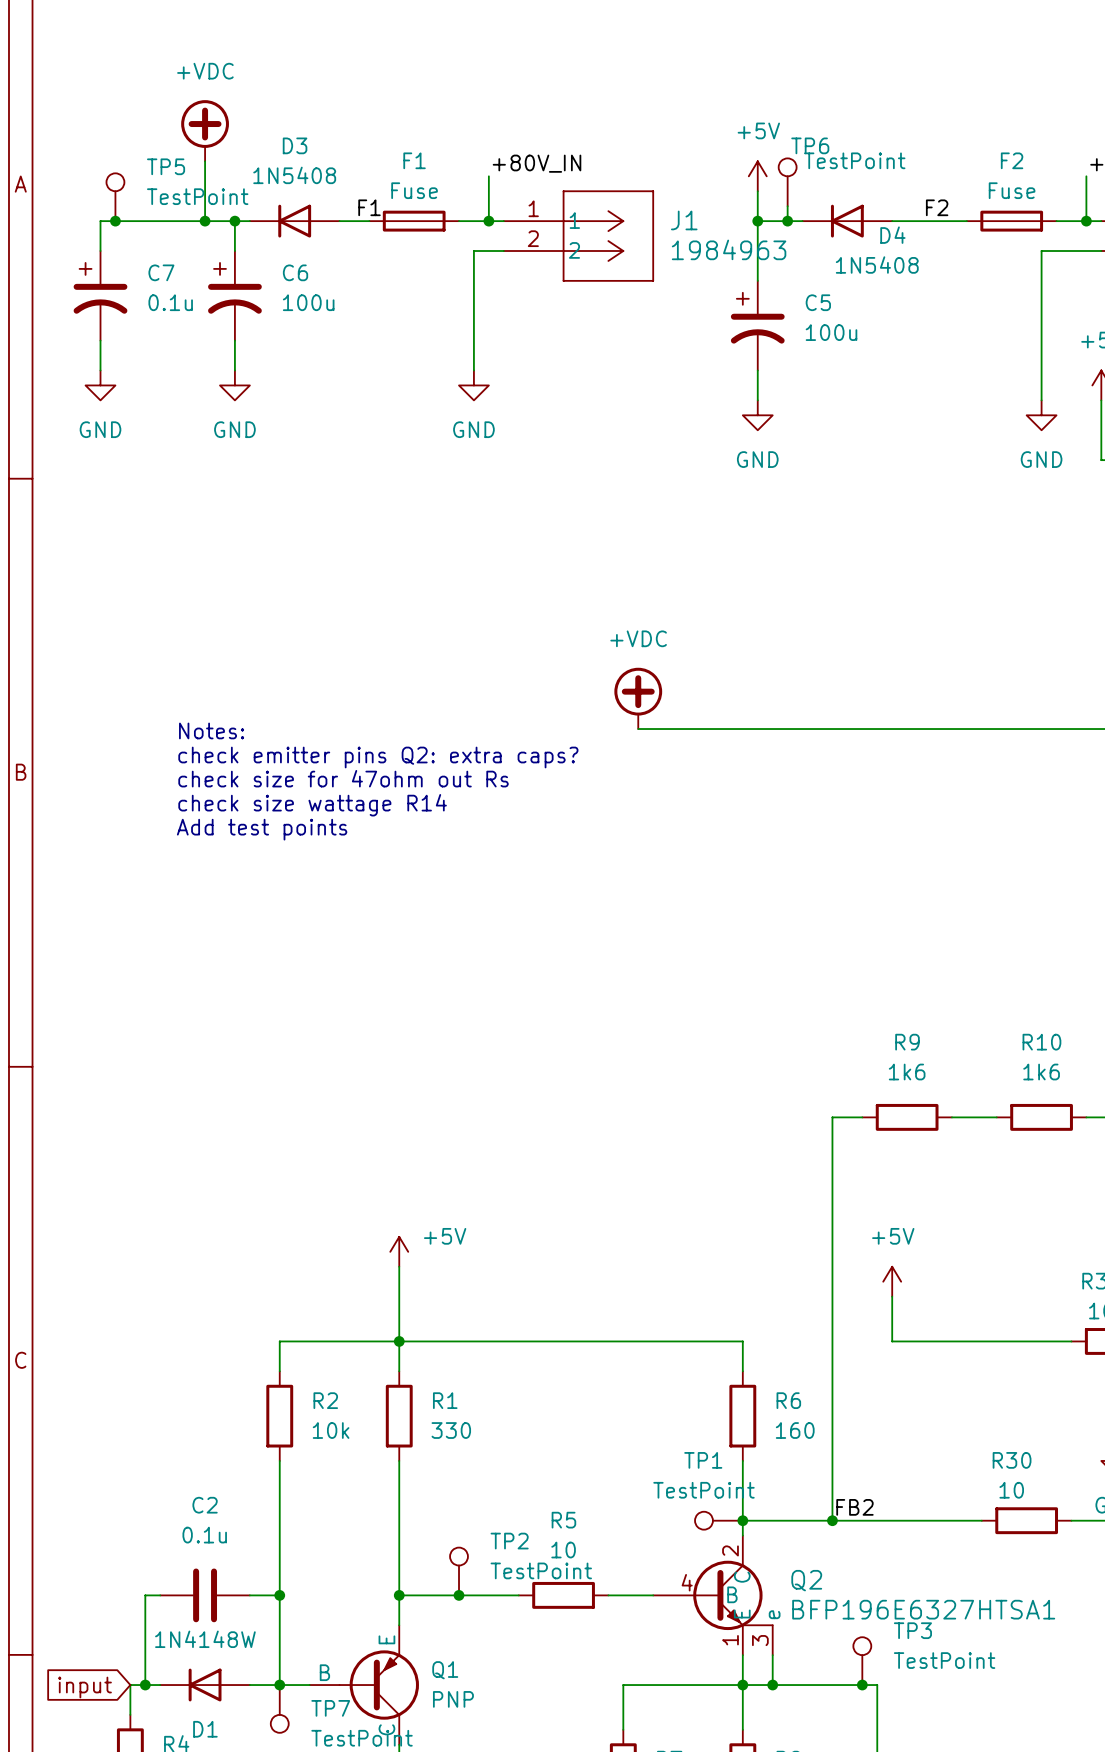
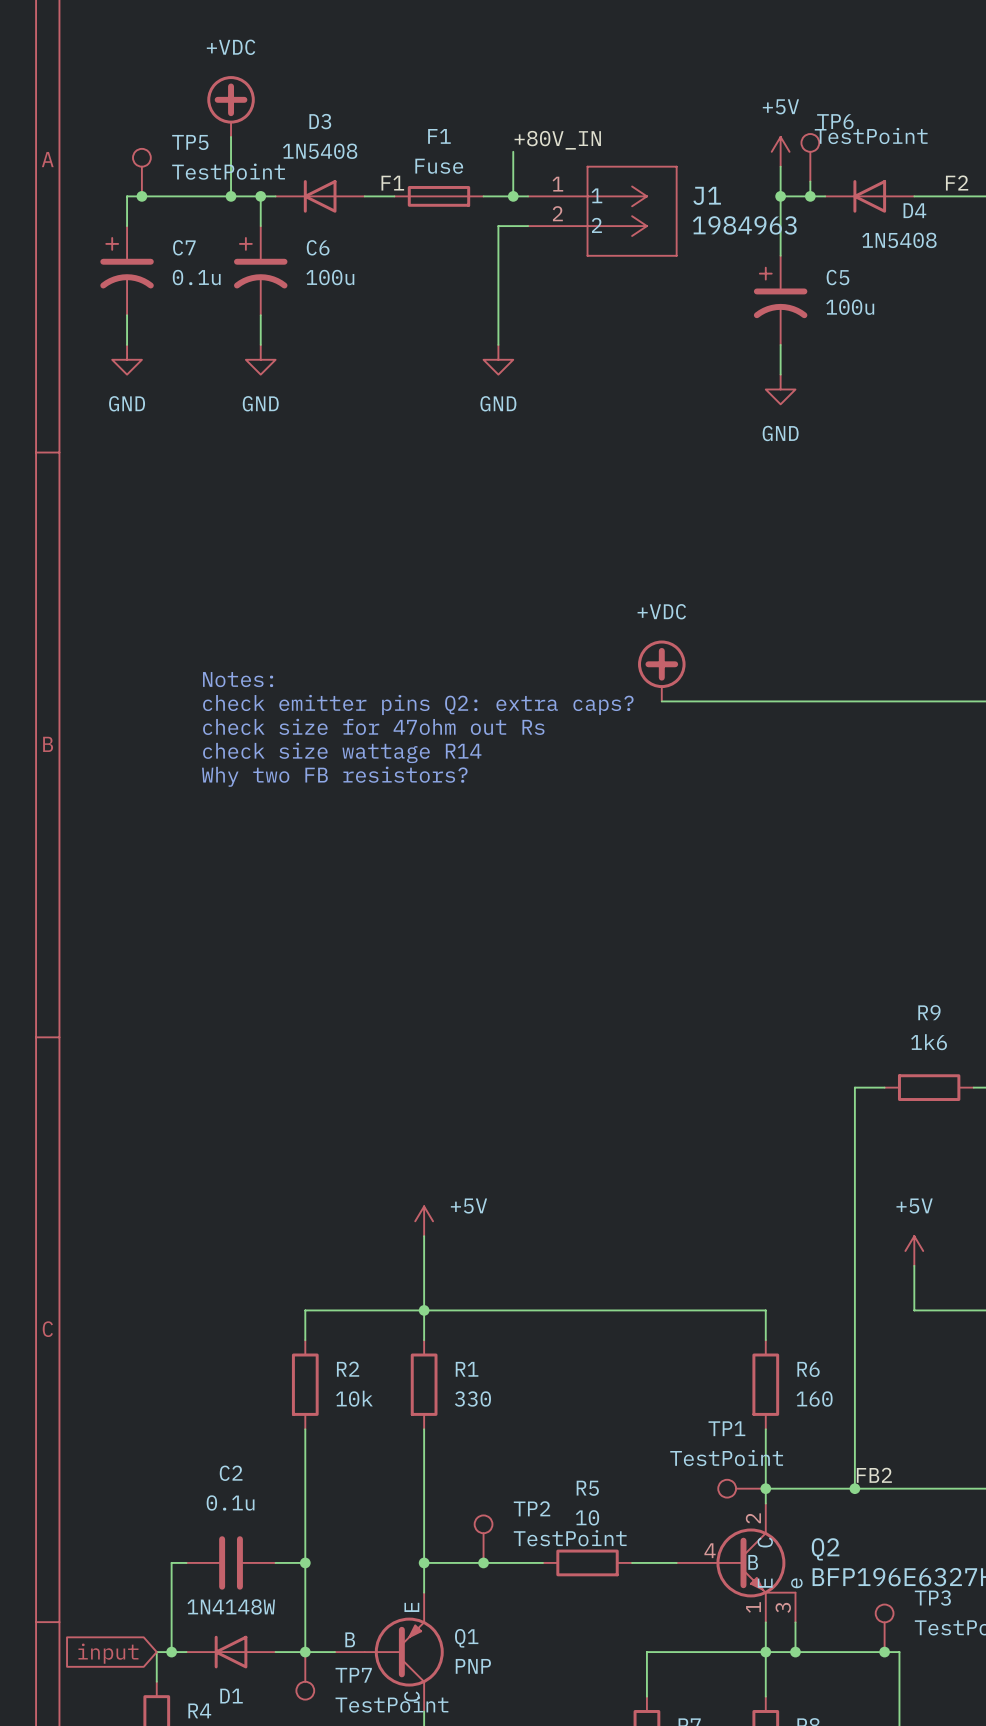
text: none -> Notes: (238, 679)
text: Notes: (211, 730) -> check emitter pins Q2: extra caps? (418, 704)
text: check emitter pins Q2: extra caps? (378, 757) -> check size for 47ohm out Rs (373, 726)
text: check size for 47ohm out Rs (343, 778) -> check size wattage R14 (342, 752)
text: check size wattage R14 (312, 805) -> Why two FB resistors? (334, 776)
text: Add test points (262, 829) -> none

